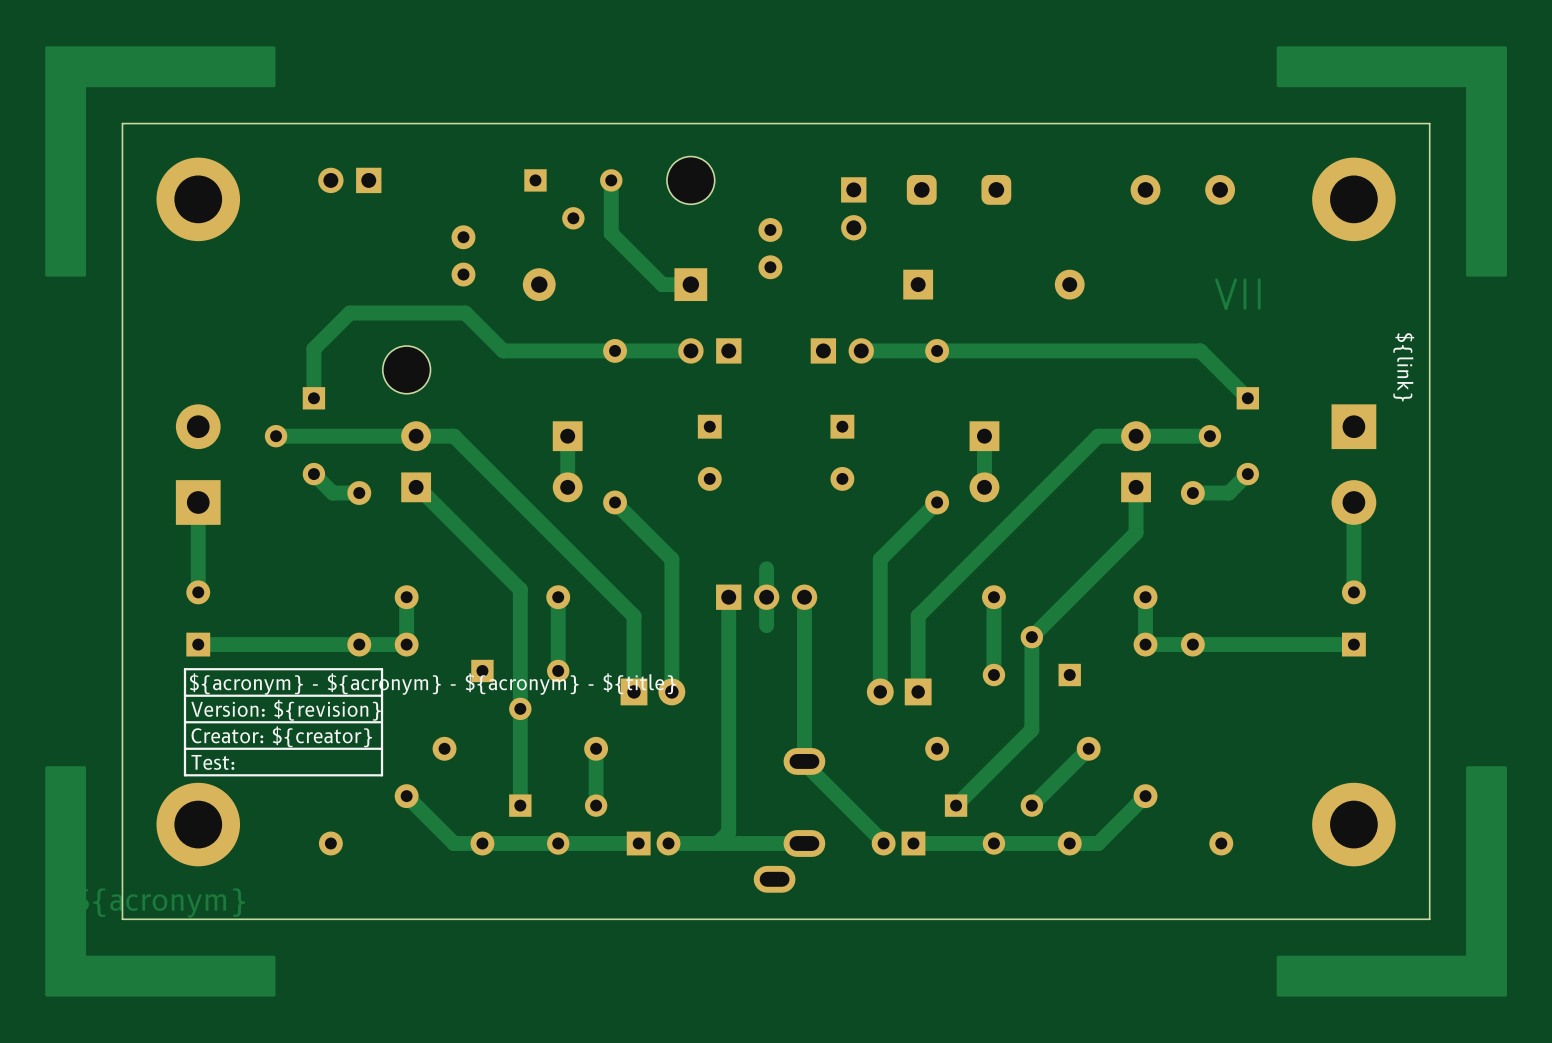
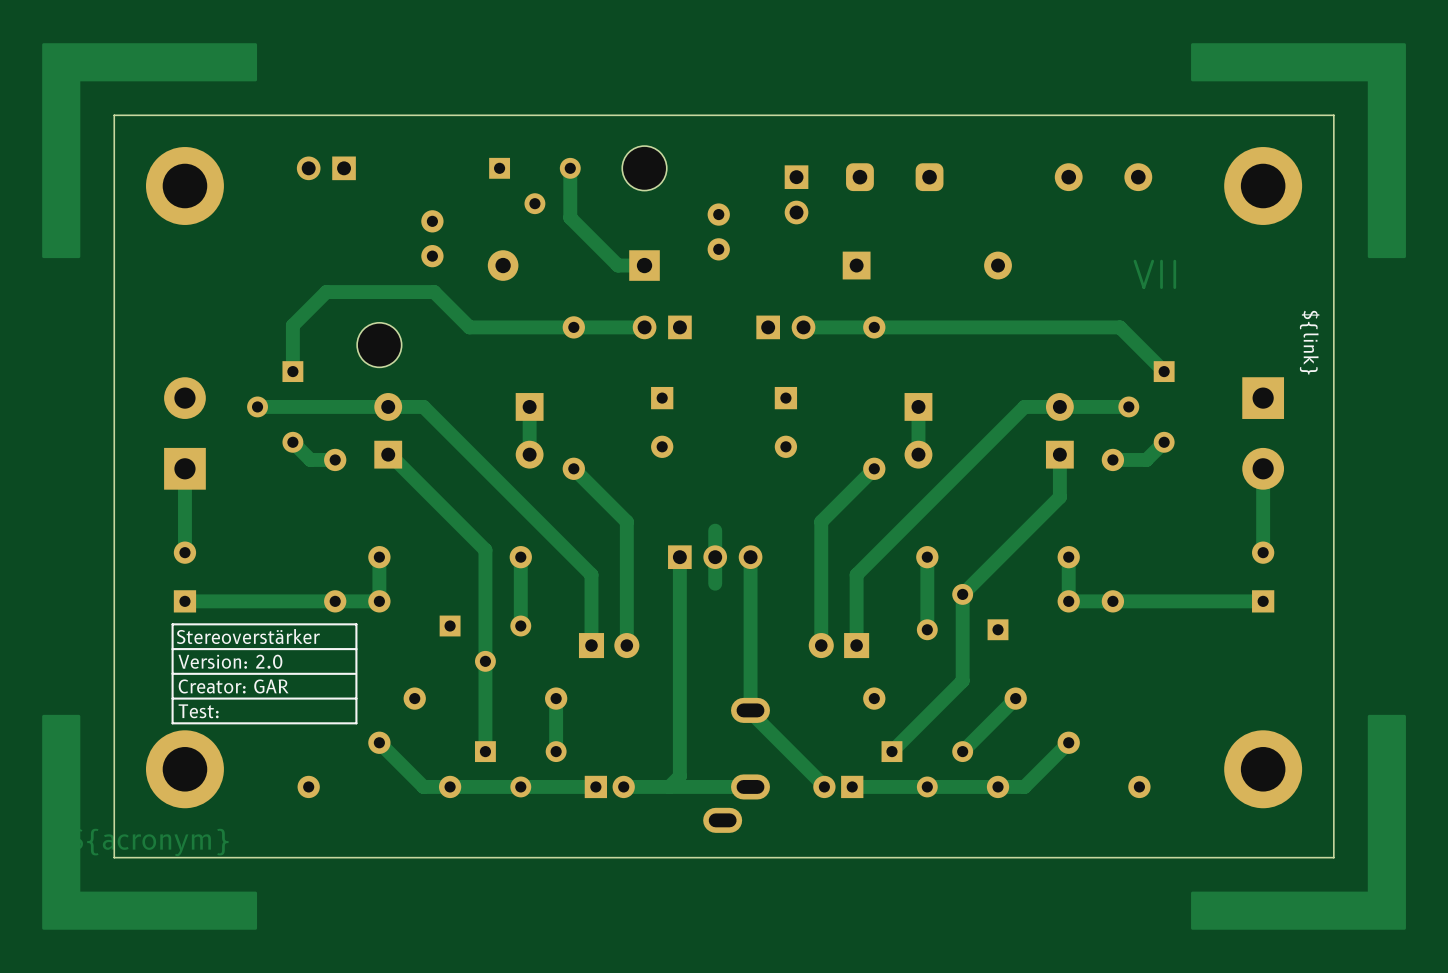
text: ${acronym} - ${acronym} - ${acronym} - ${title} (432, 684) -> Stereoverstärker (248, 636)
text: Version: ${revision} (286, 710) -> Version: 2.0 (230, 661)
text: Creator: ${creator} (281, 736) -> Creator: GAR (233, 686)

